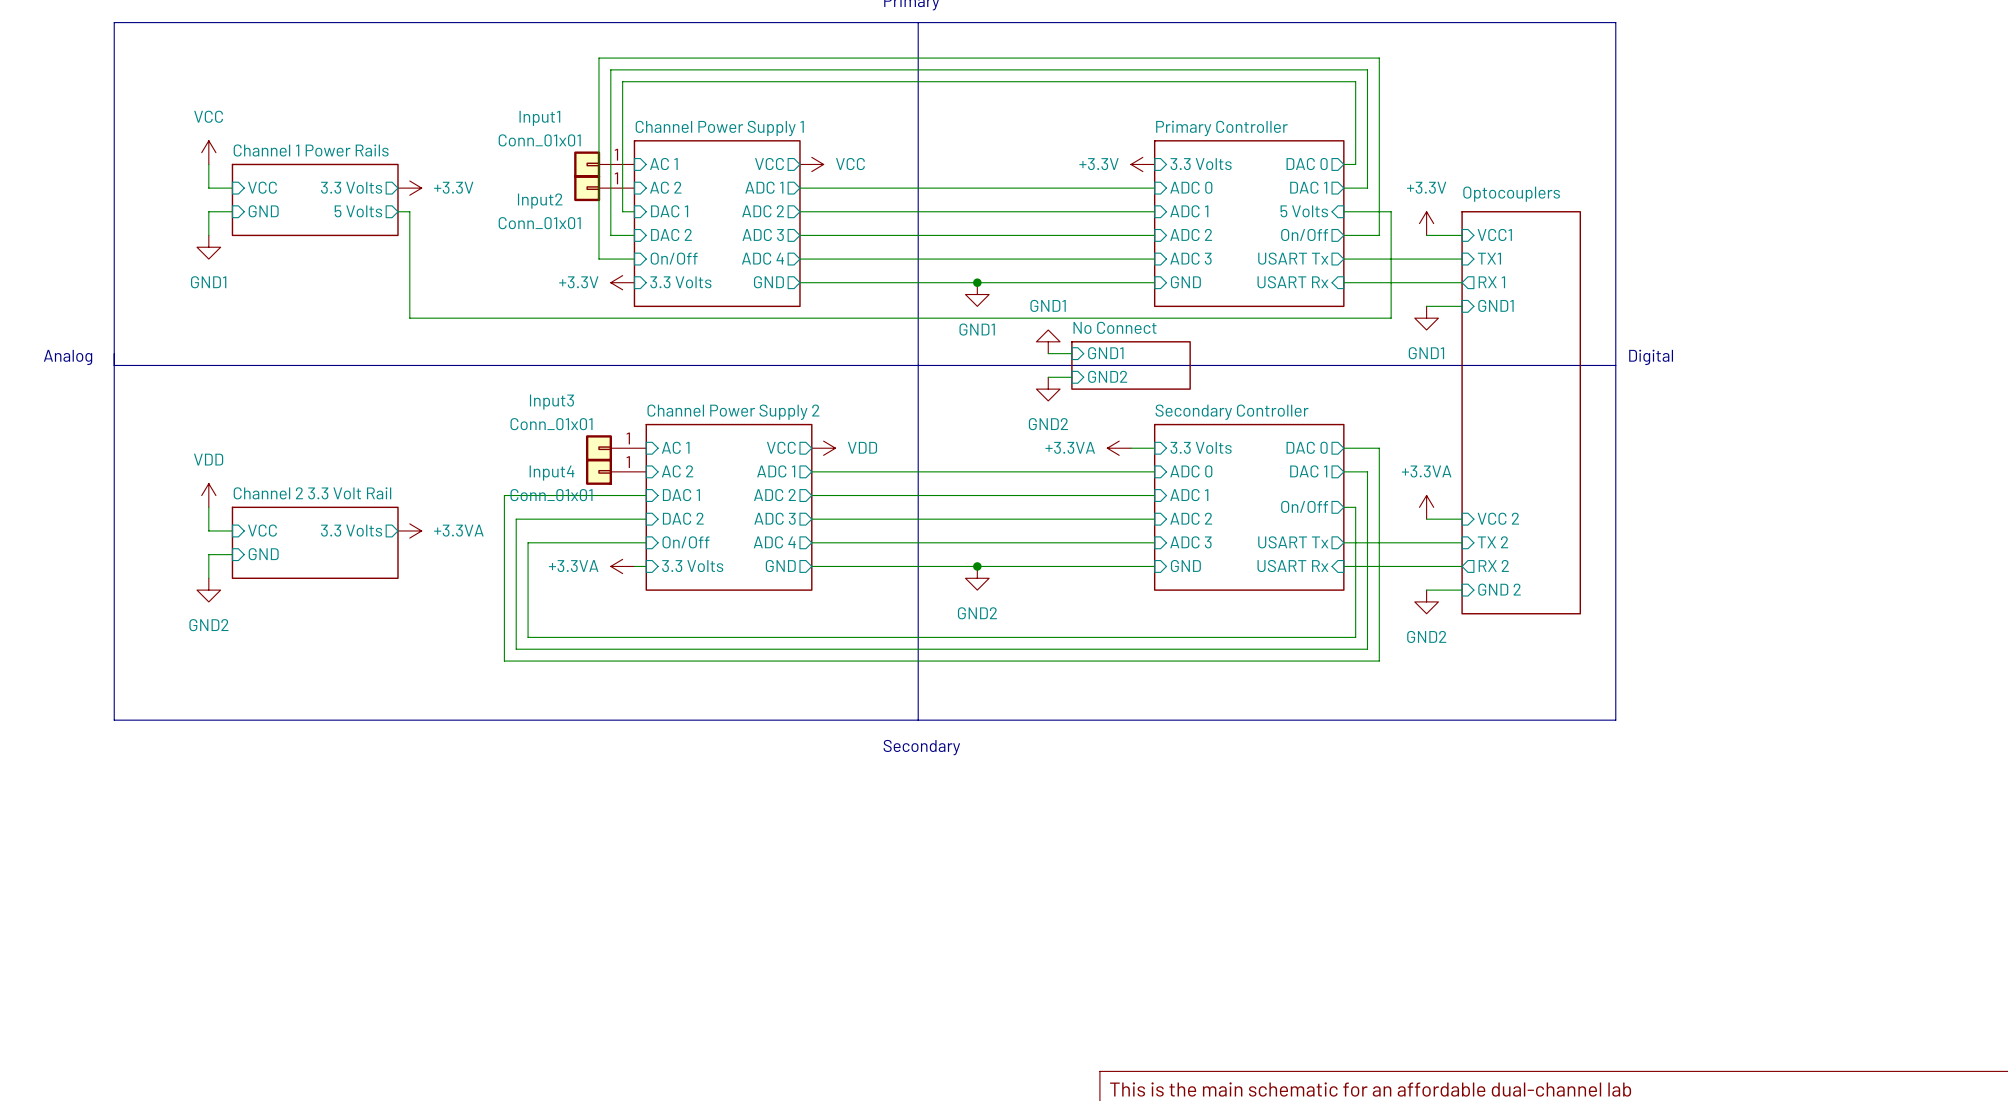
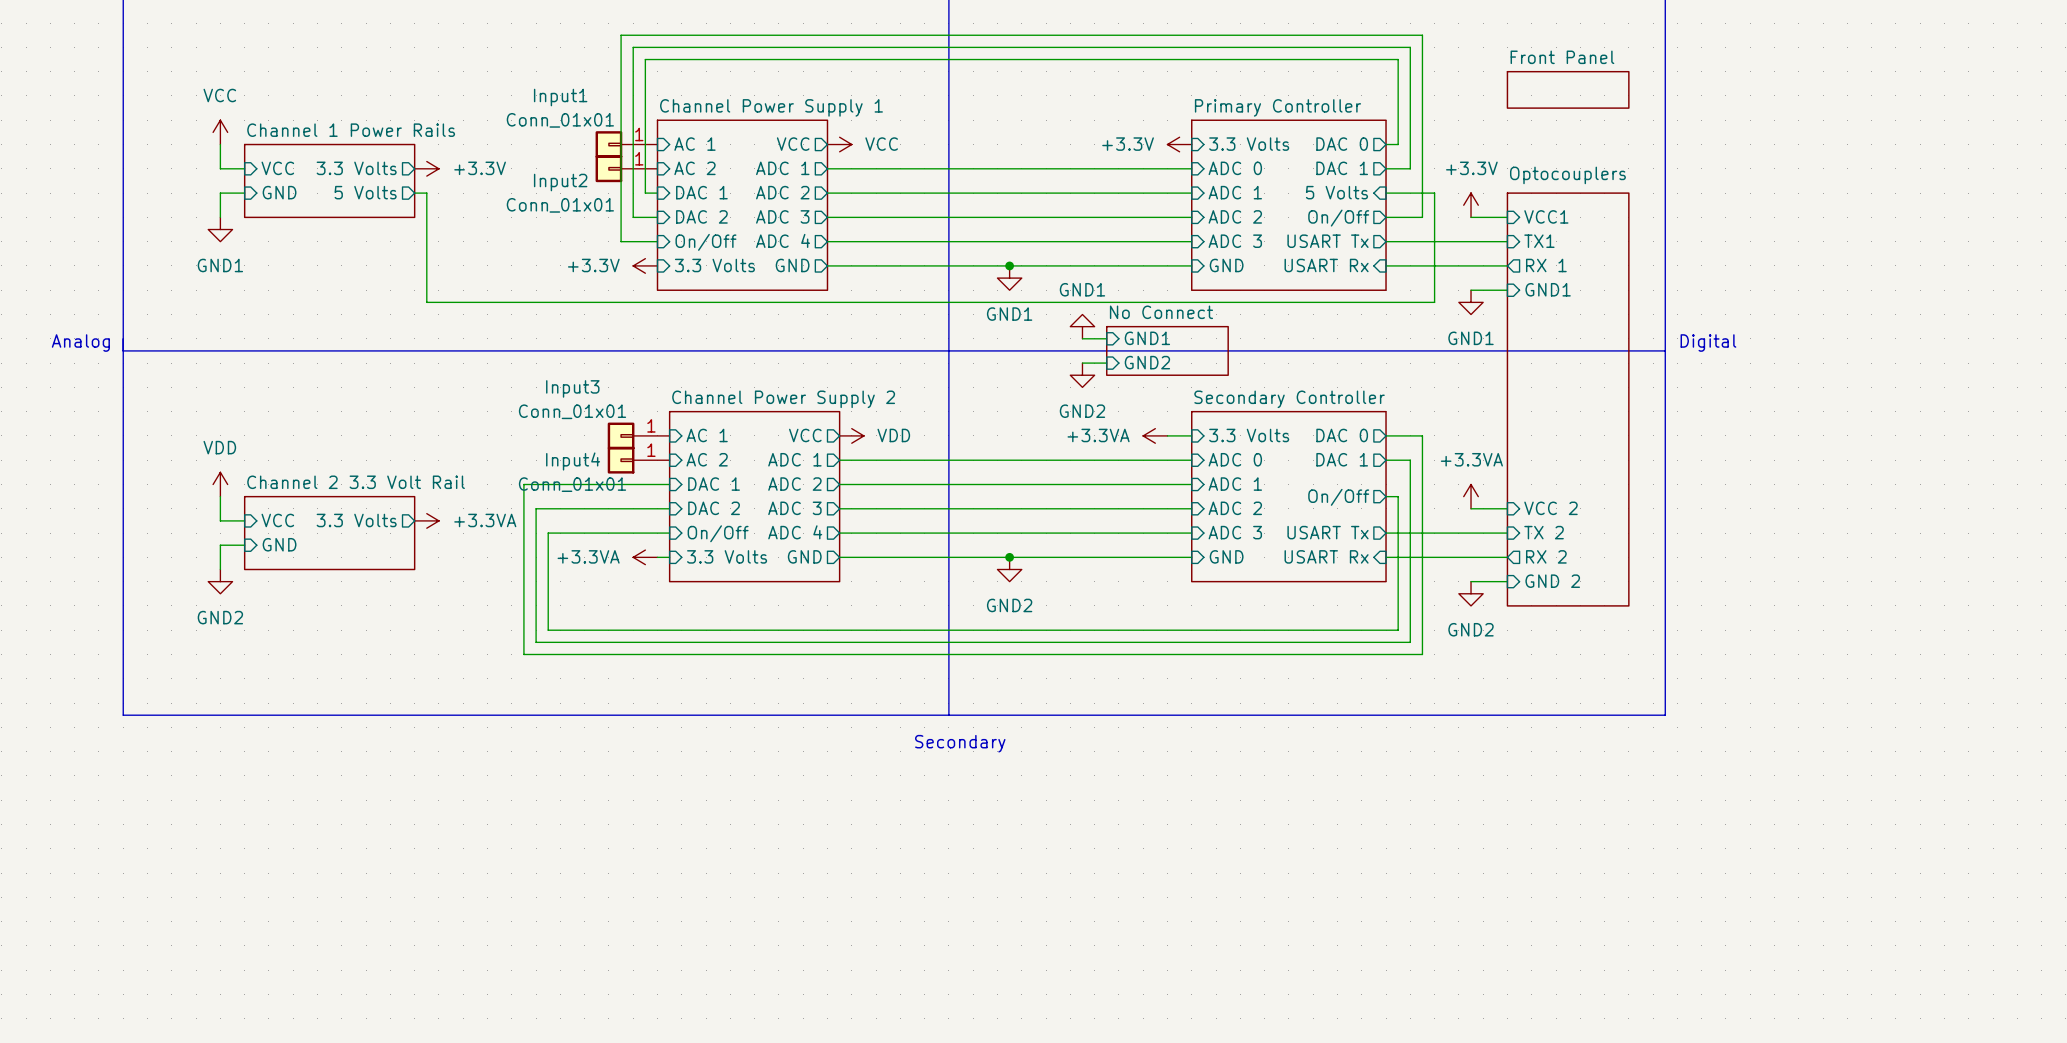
sheet Front Panel: none -> (1568, 89)

